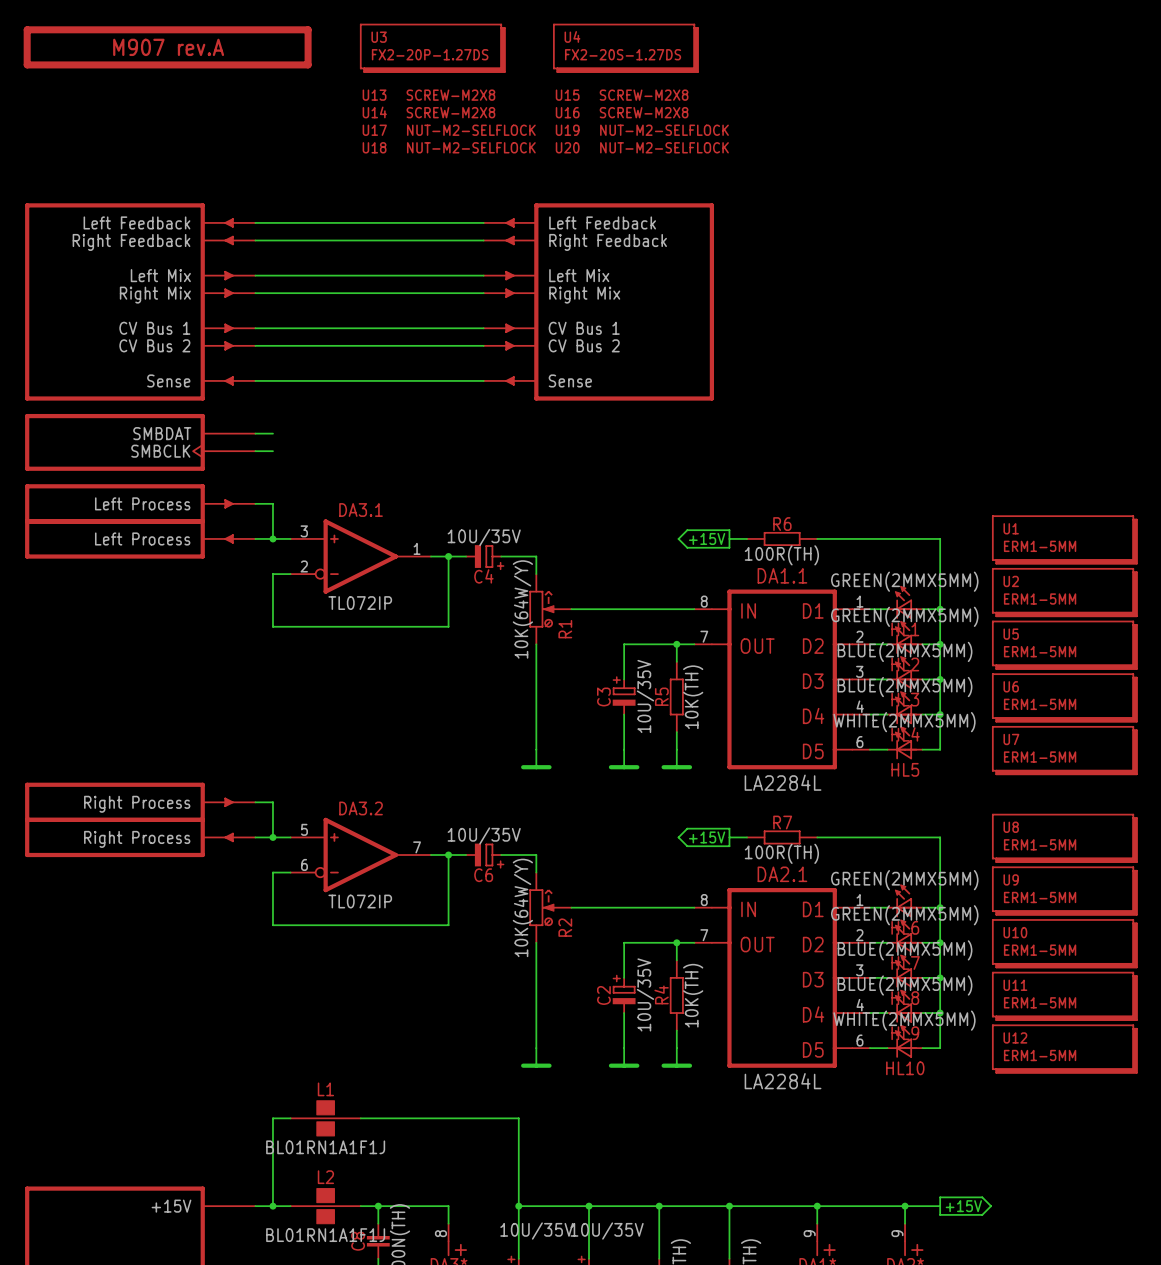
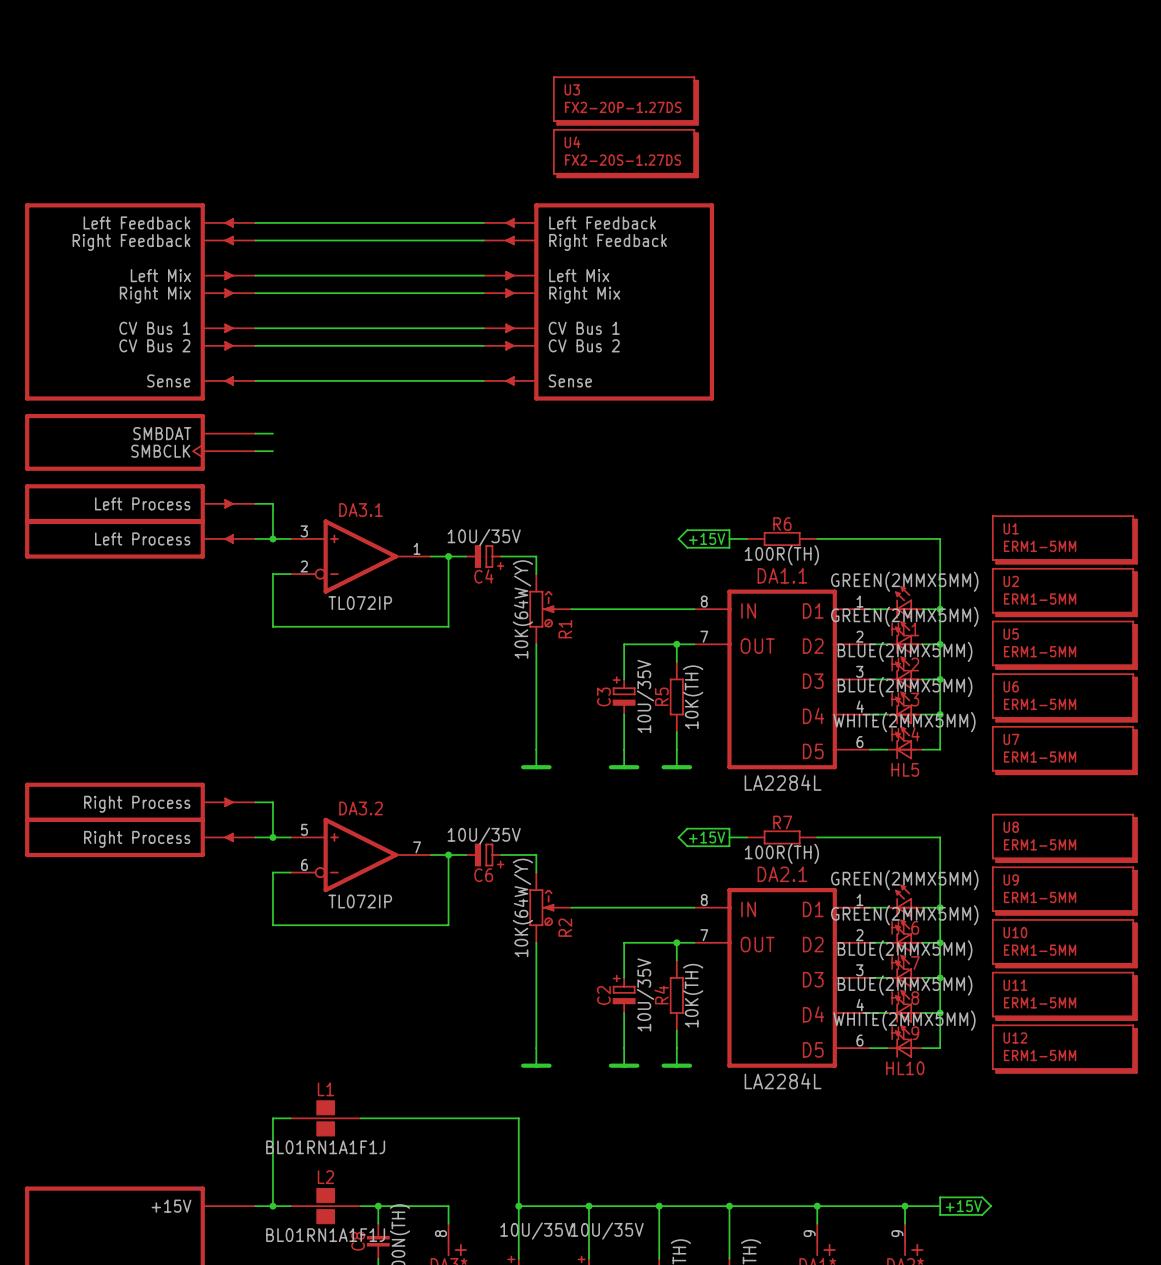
part: M907 rev.A (167, 47) -> none
U3 position: (432, 48) -> (625, 100)
U4 position: (625, 48) -> (625, 153)
U13: SCREW-M2X8 (429, 95) -> none
U15: SCREW-M2X8 (622, 95) -> none
U14: SCREW-M2X8 (429, 112) -> none
U16: SCREW-M2X8 (622, 112) -> none
U17: NUT-M2-SELFLOCK (449, 130) -> none
U19: NUT-M2-SELFLOCK (642, 130) -> none
U18: NUT-M2-SELFLOCK (449, 147) -> none
U20: NUT-M2-SELFLOCK (642, 147) -> none

